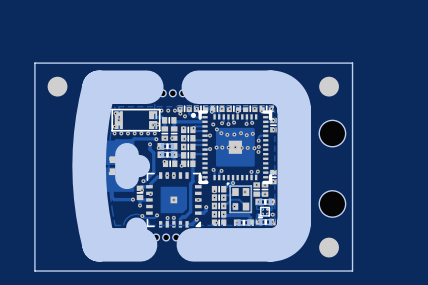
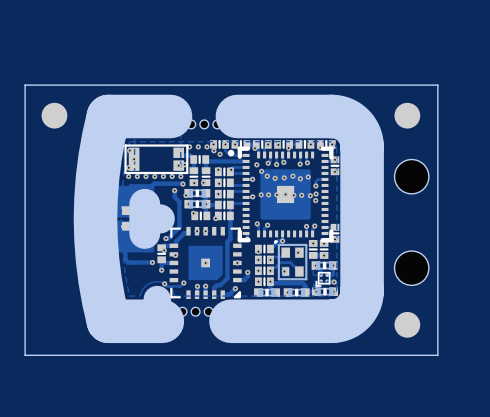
part footprint: [211, 219, 227, 227] -> [254, 288, 281, 297]

